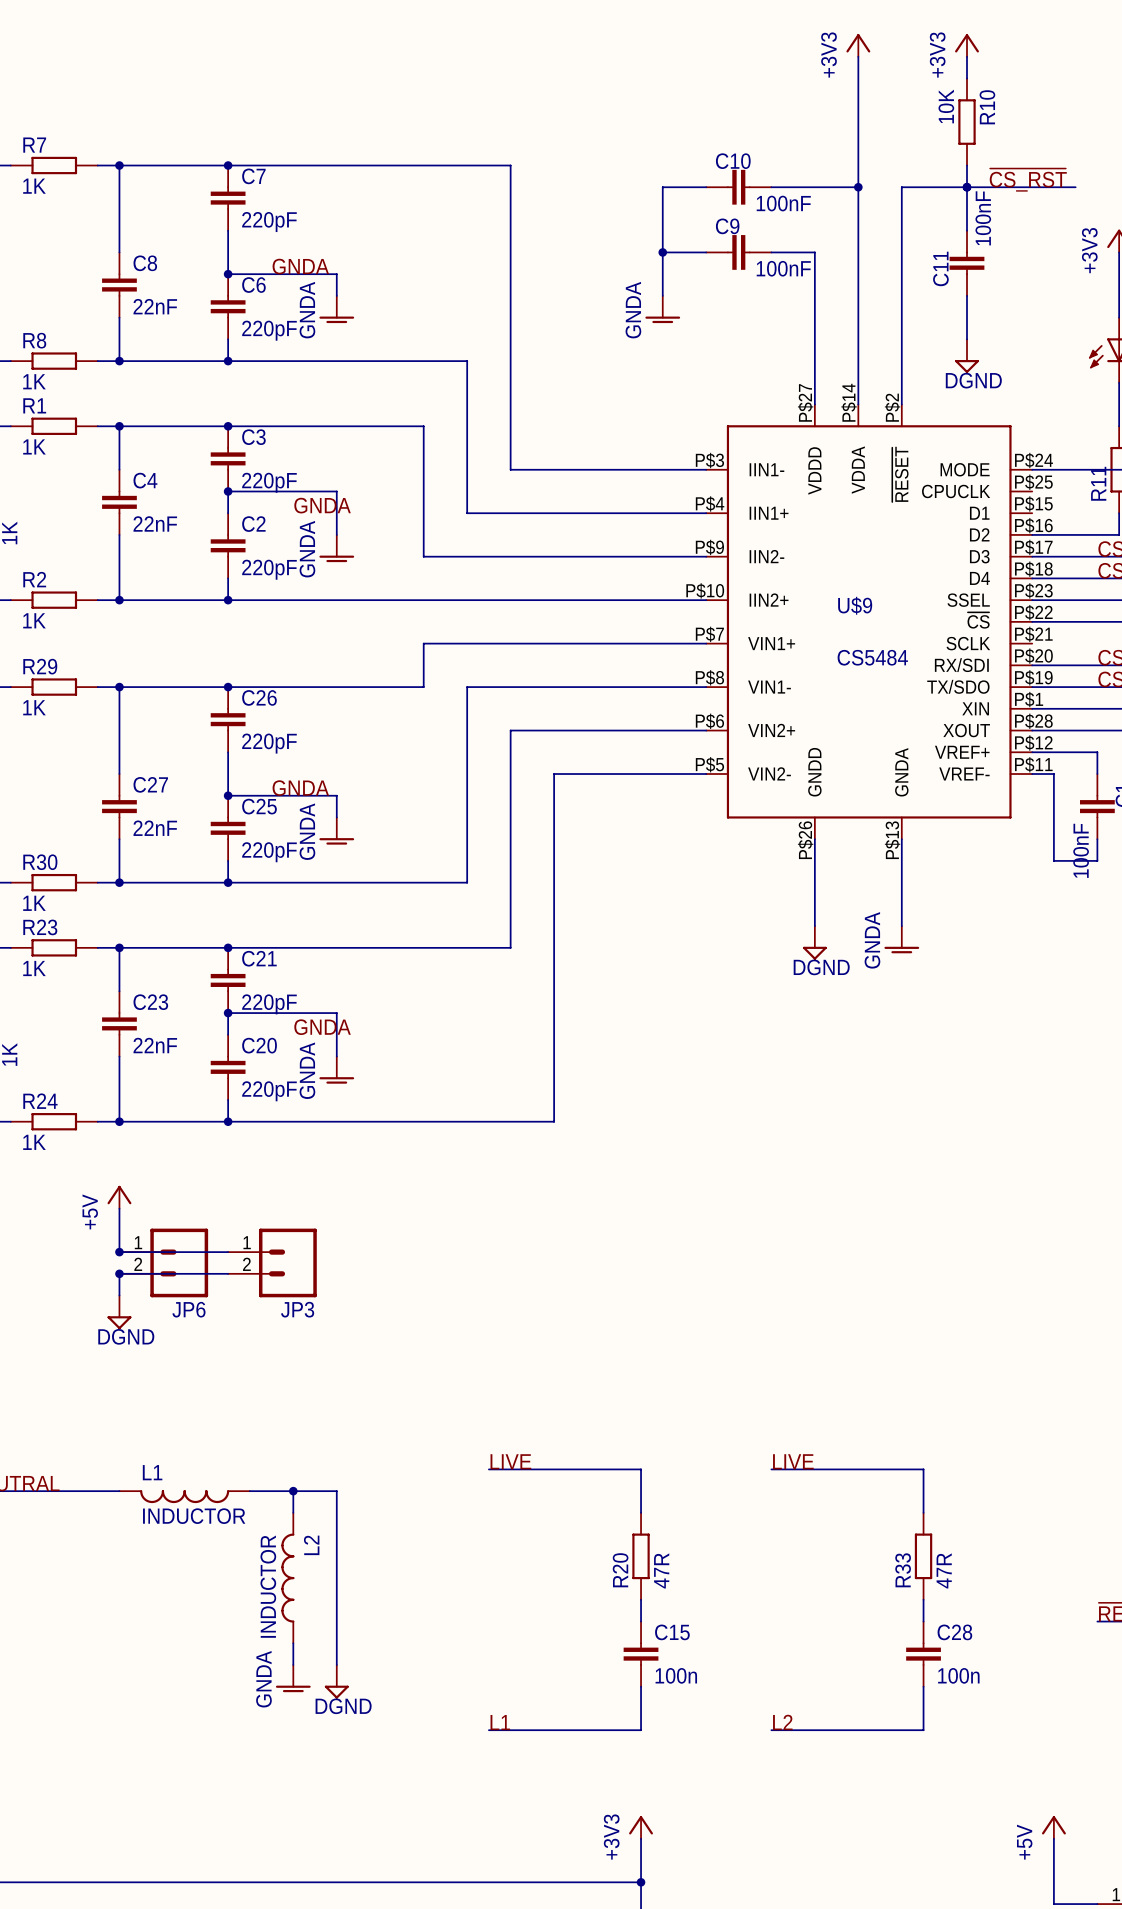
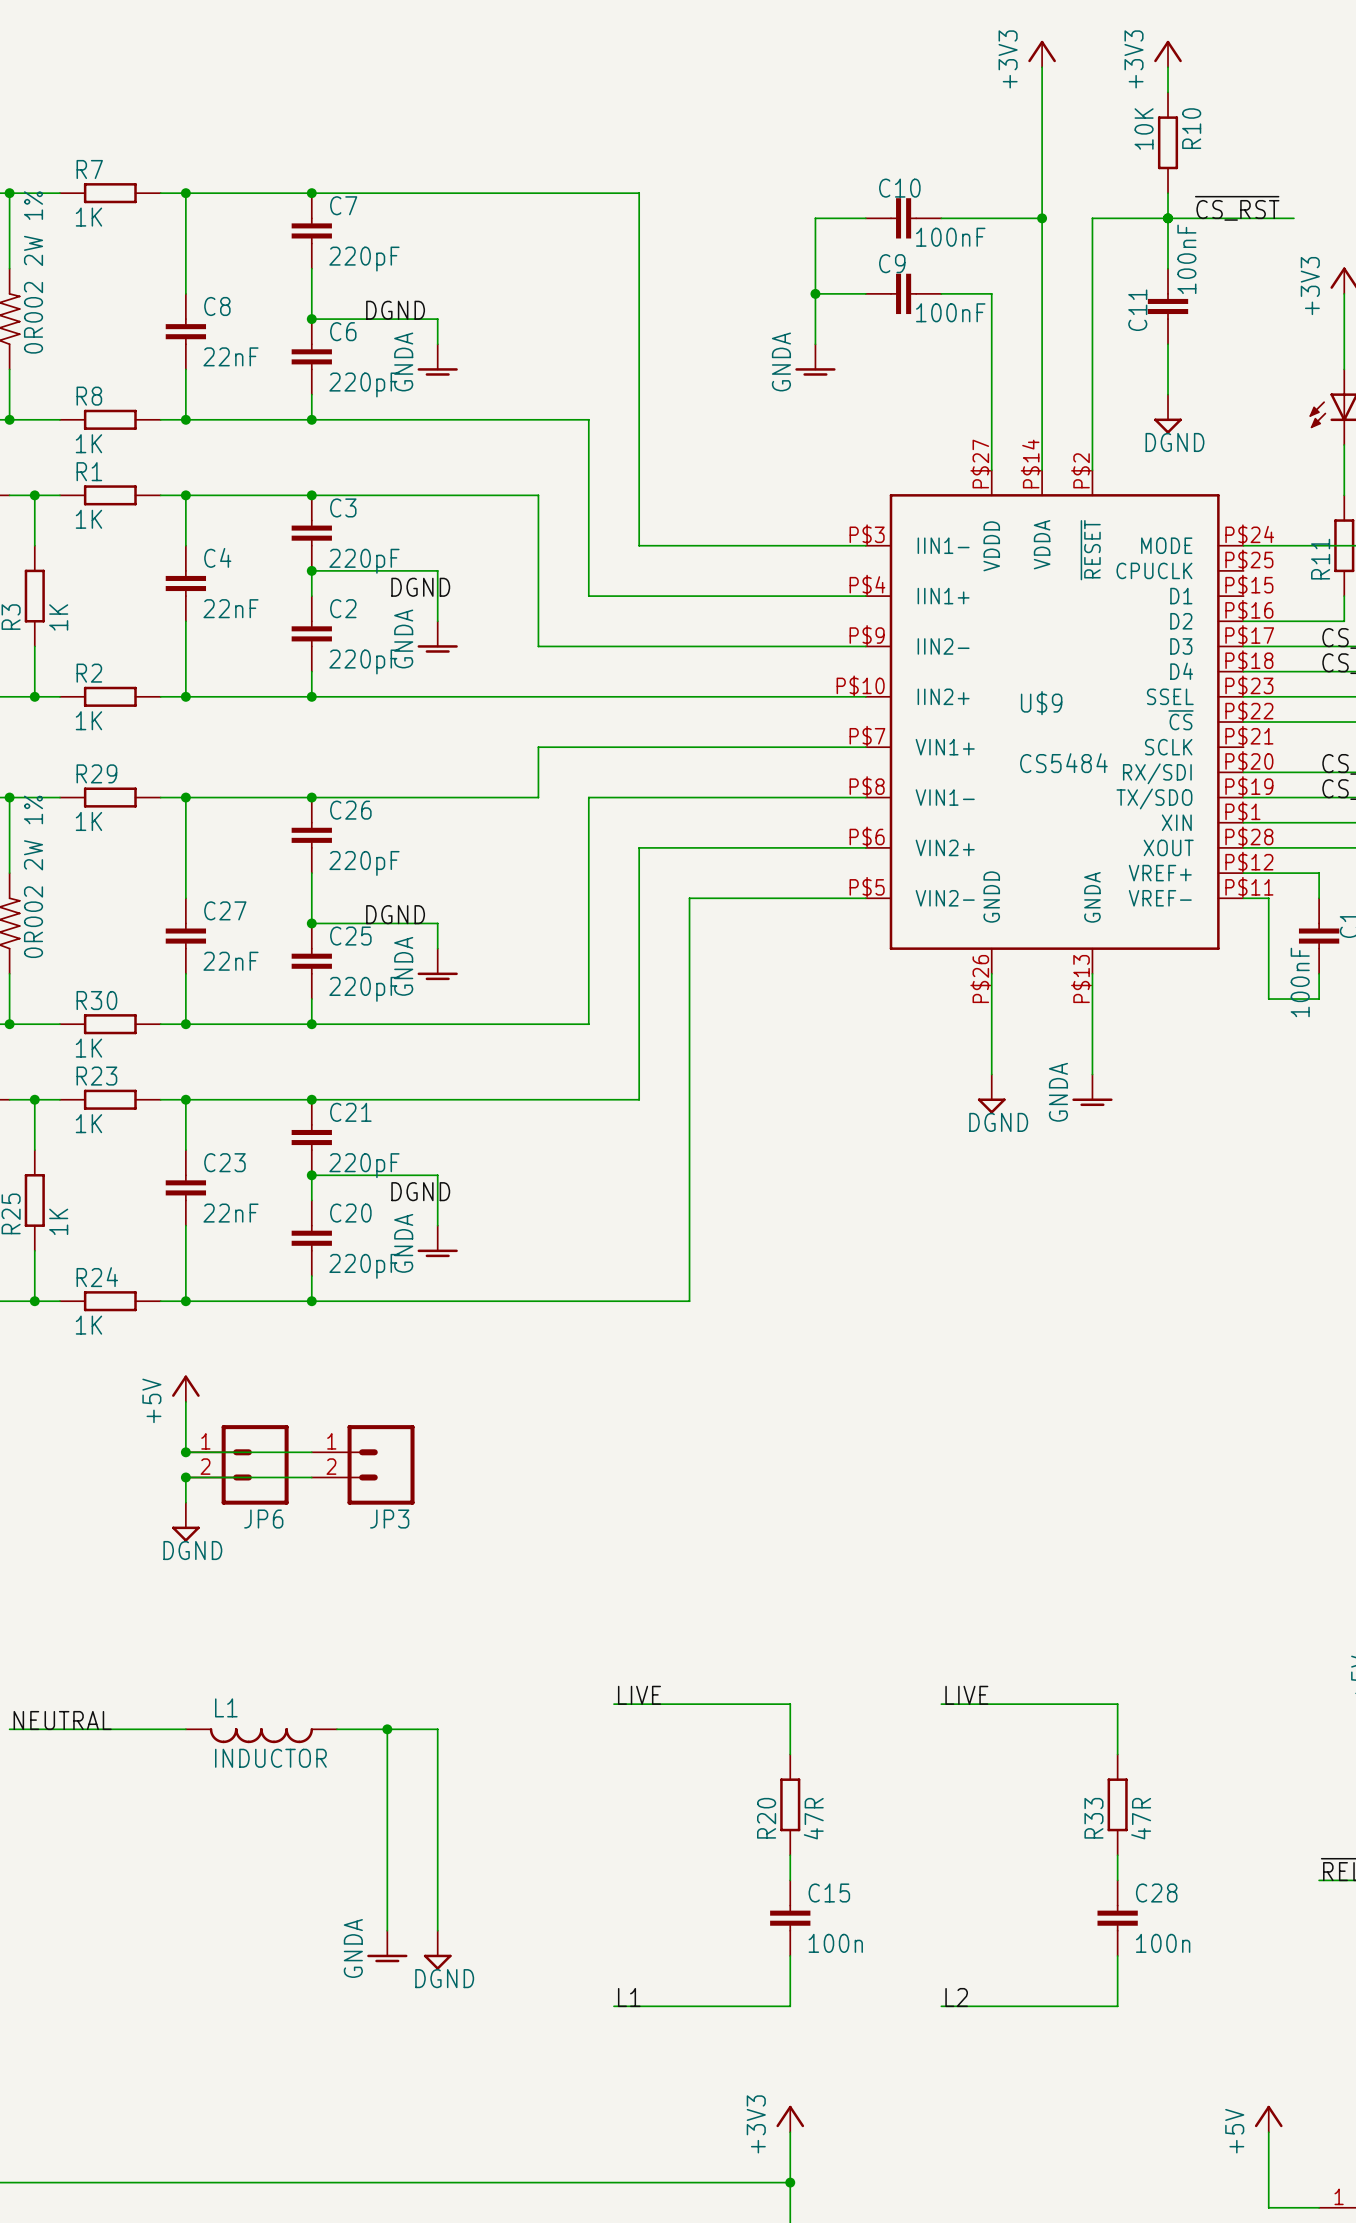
label: GNDA (300, 266) -> DGND (395, 310)
label: GNDA (322, 505) -> DGND (420, 587)
label: GNDA (300, 788) -> DGND (395, 914)
label: GNDA (322, 1027) -> DGND (420, 1191)
wire: none -> (387, 1754) (387, 1905)
L2: INDUCTOR (287, 1578) -> none

